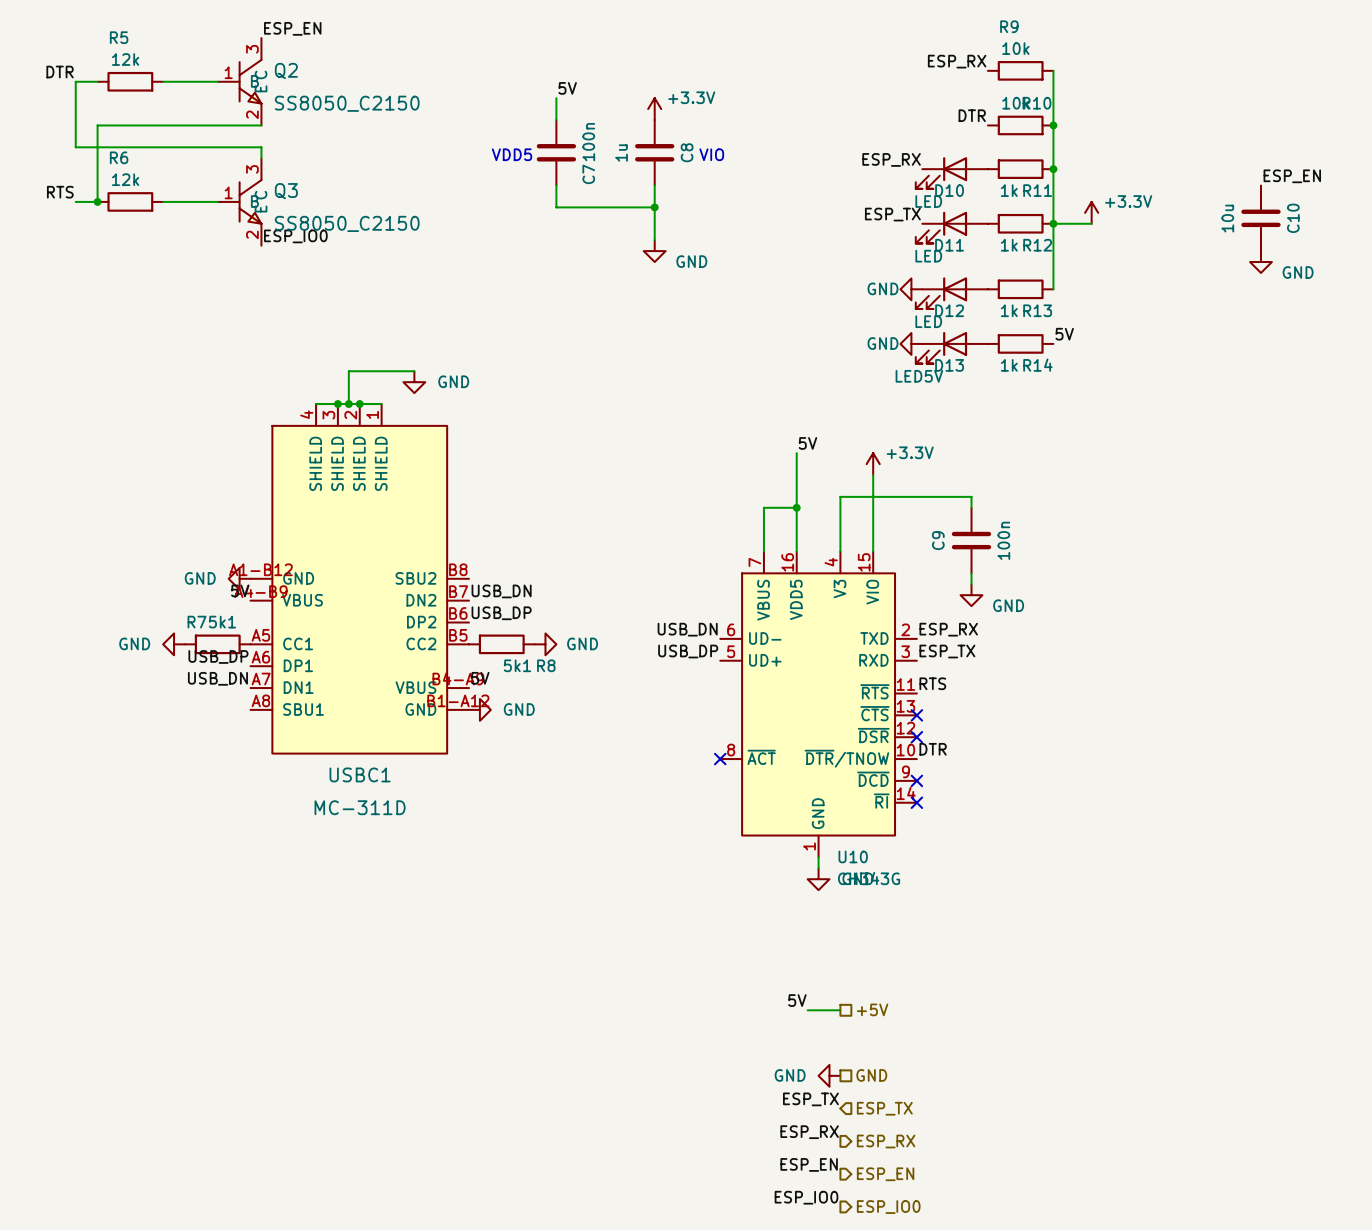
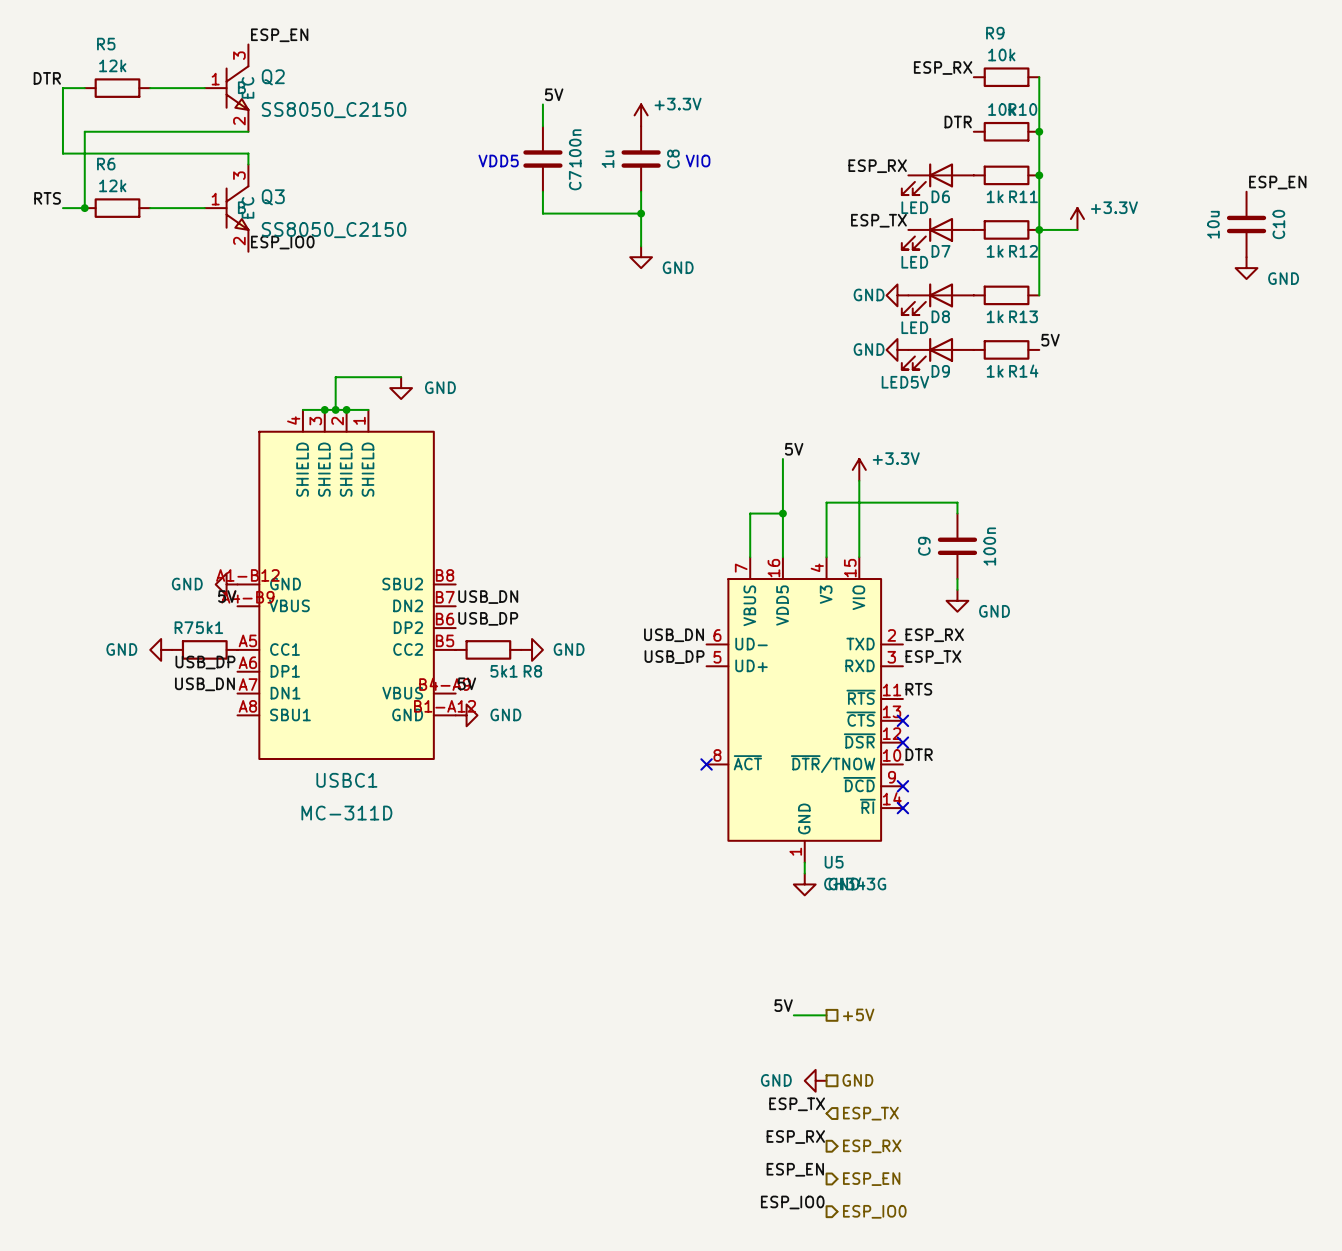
D10 name: D10 (949, 190) -> D6 (940, 196)
D11 name: D11 (949, 245) -> D7 (941, 251)
D12 name: D12 (949, 310) -> D8 (940, 316)
D13 name: D13 (949, 365) -> D9 (940, 371)
U10 name: U10 (853, 856) -> U5 (834, 862)

